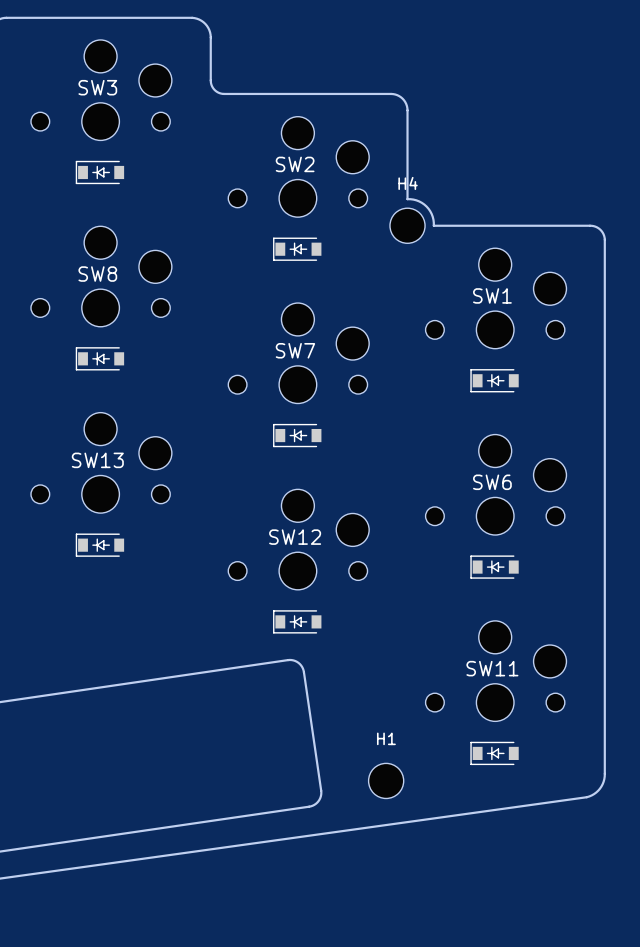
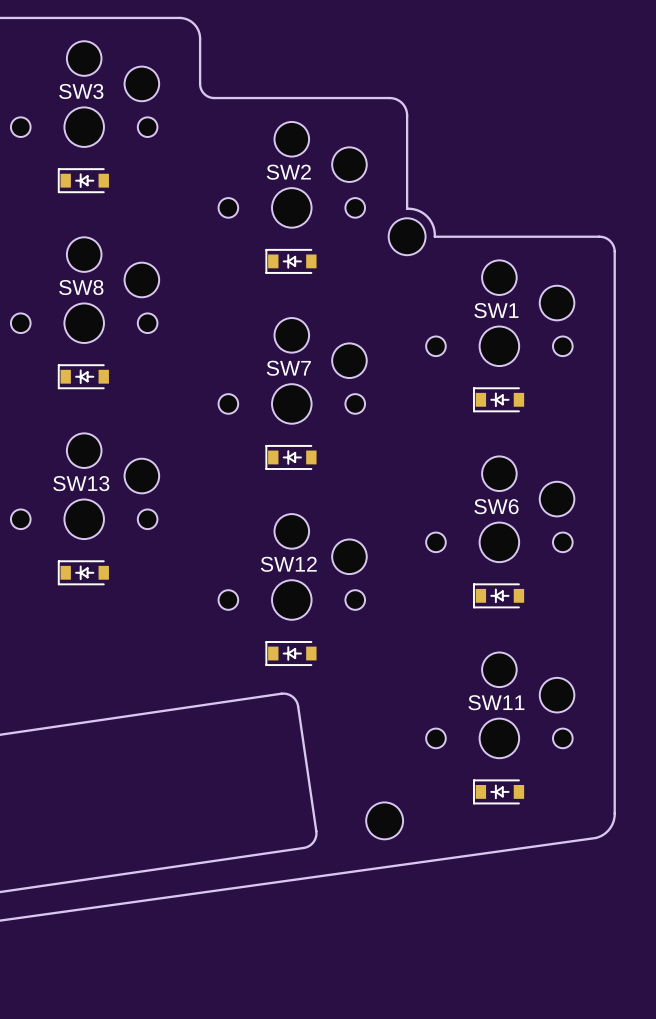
H4 name: H4 (408, 183) -> none
H1 name: H1 (386, 738) -> none

